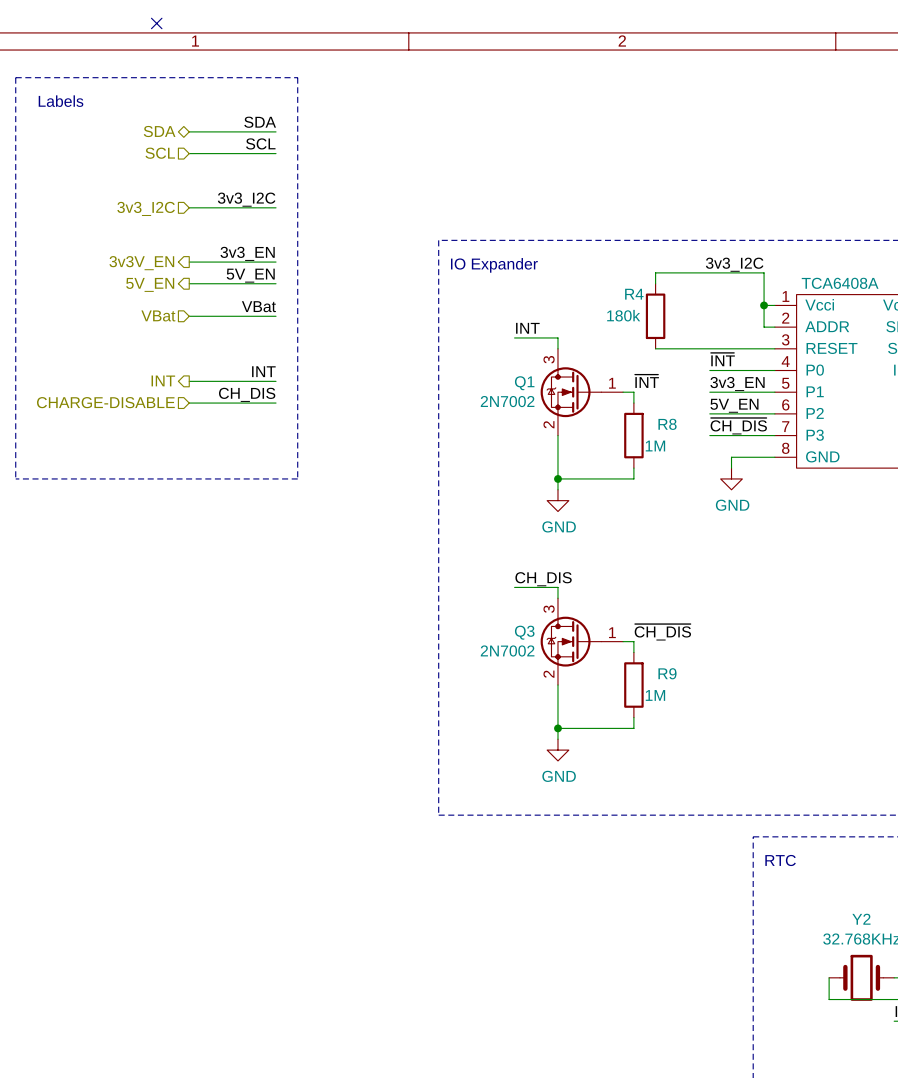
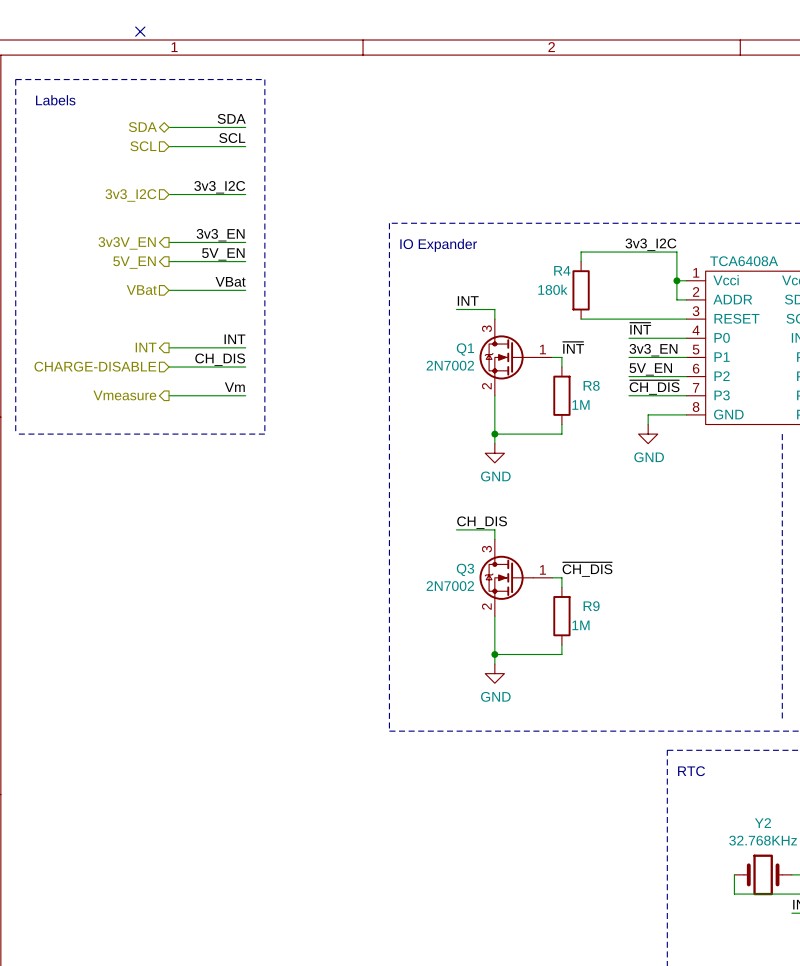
label: none -> Vm (234, 387)
hierarchical label: none -> Vmeasure (124, 395)
wire: none -> (169, 395) (245, 395)
line: none -> (782, 434) (782, 721)

